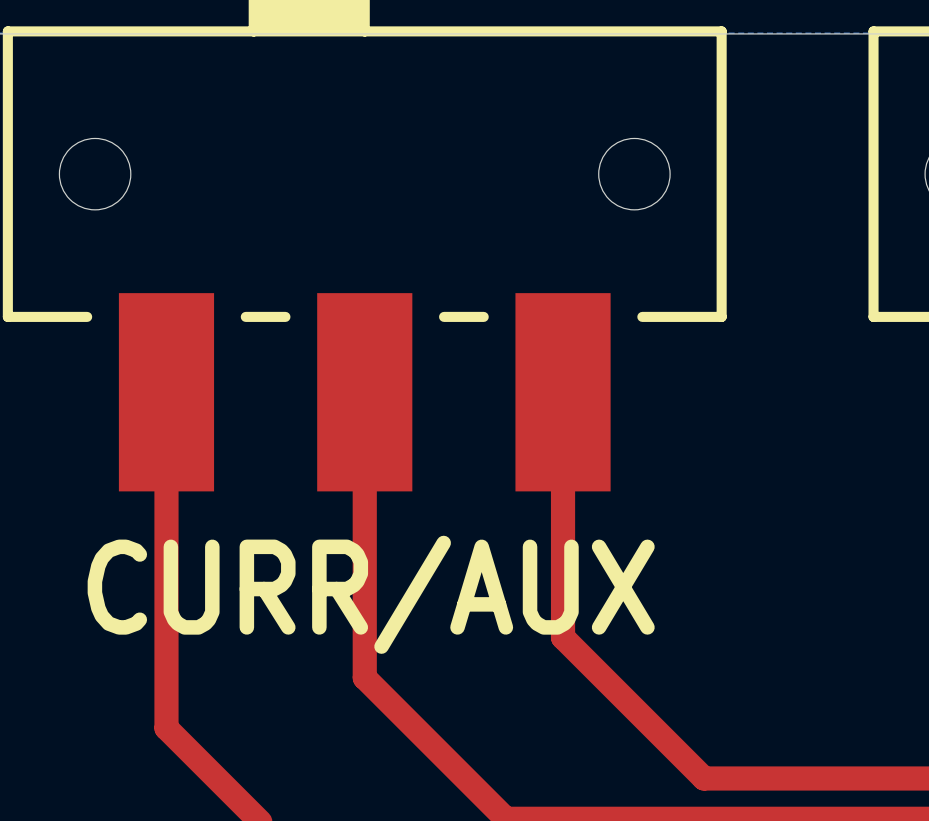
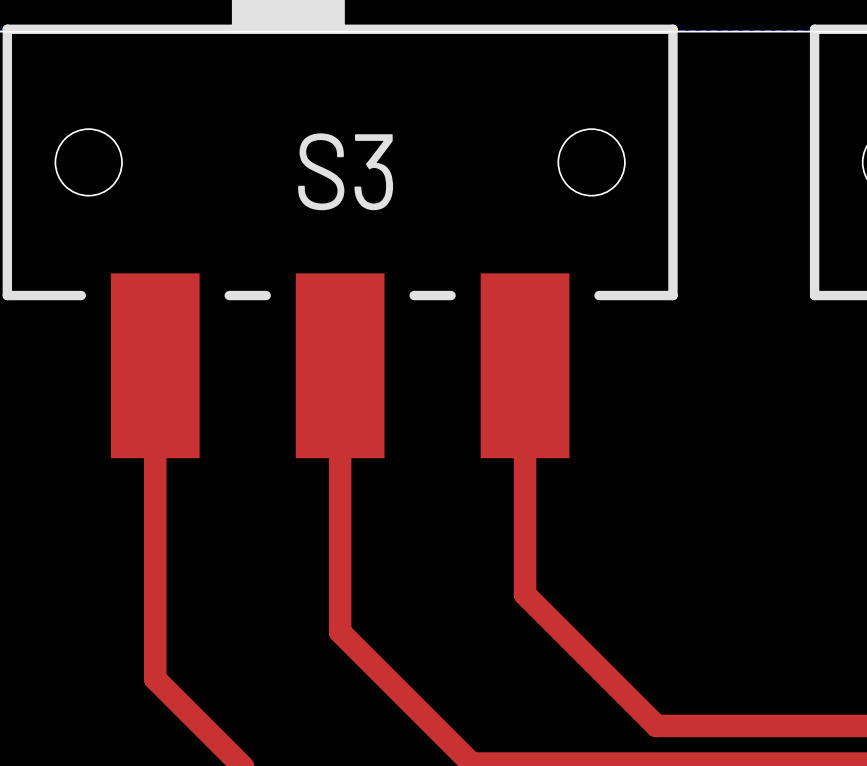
CURR/AUX name: CURR/AUX (371, 594) -> S3 (345, 171)

